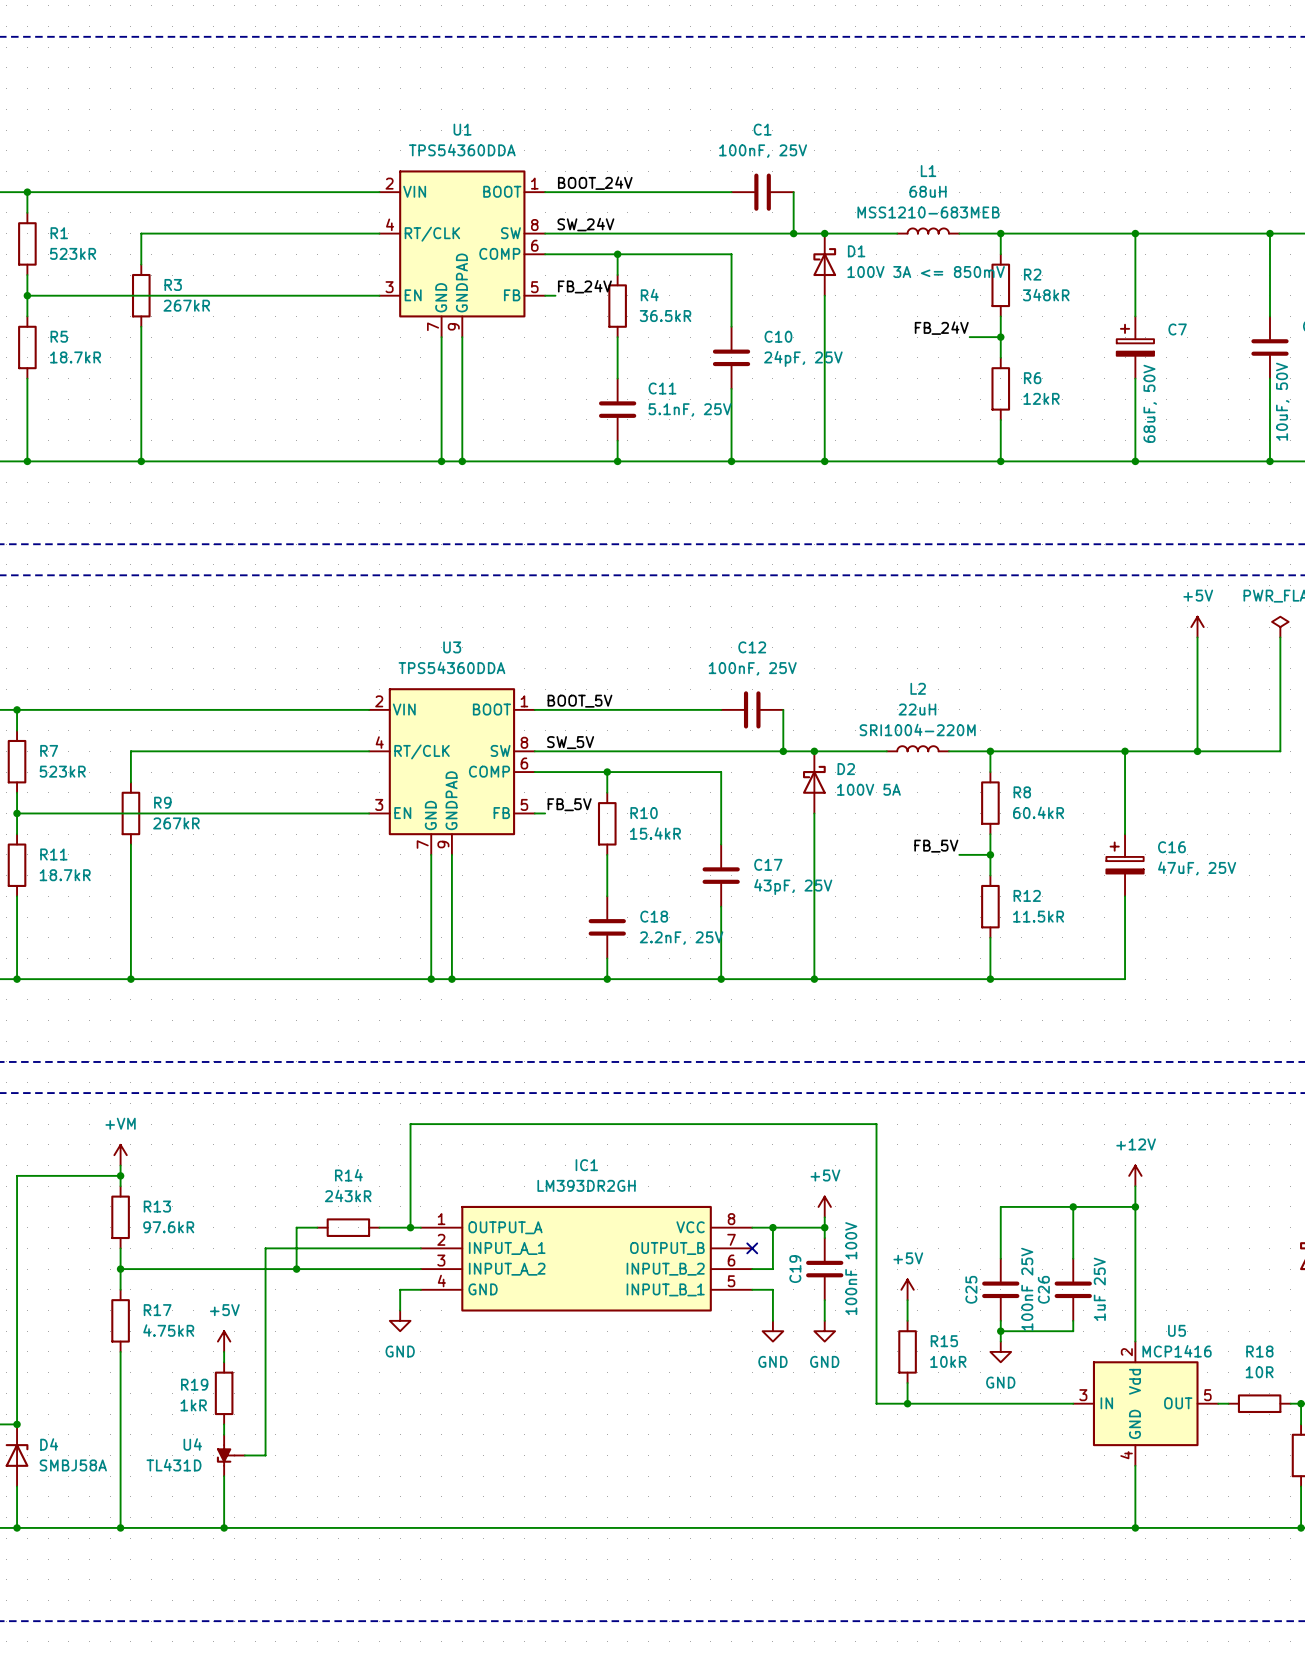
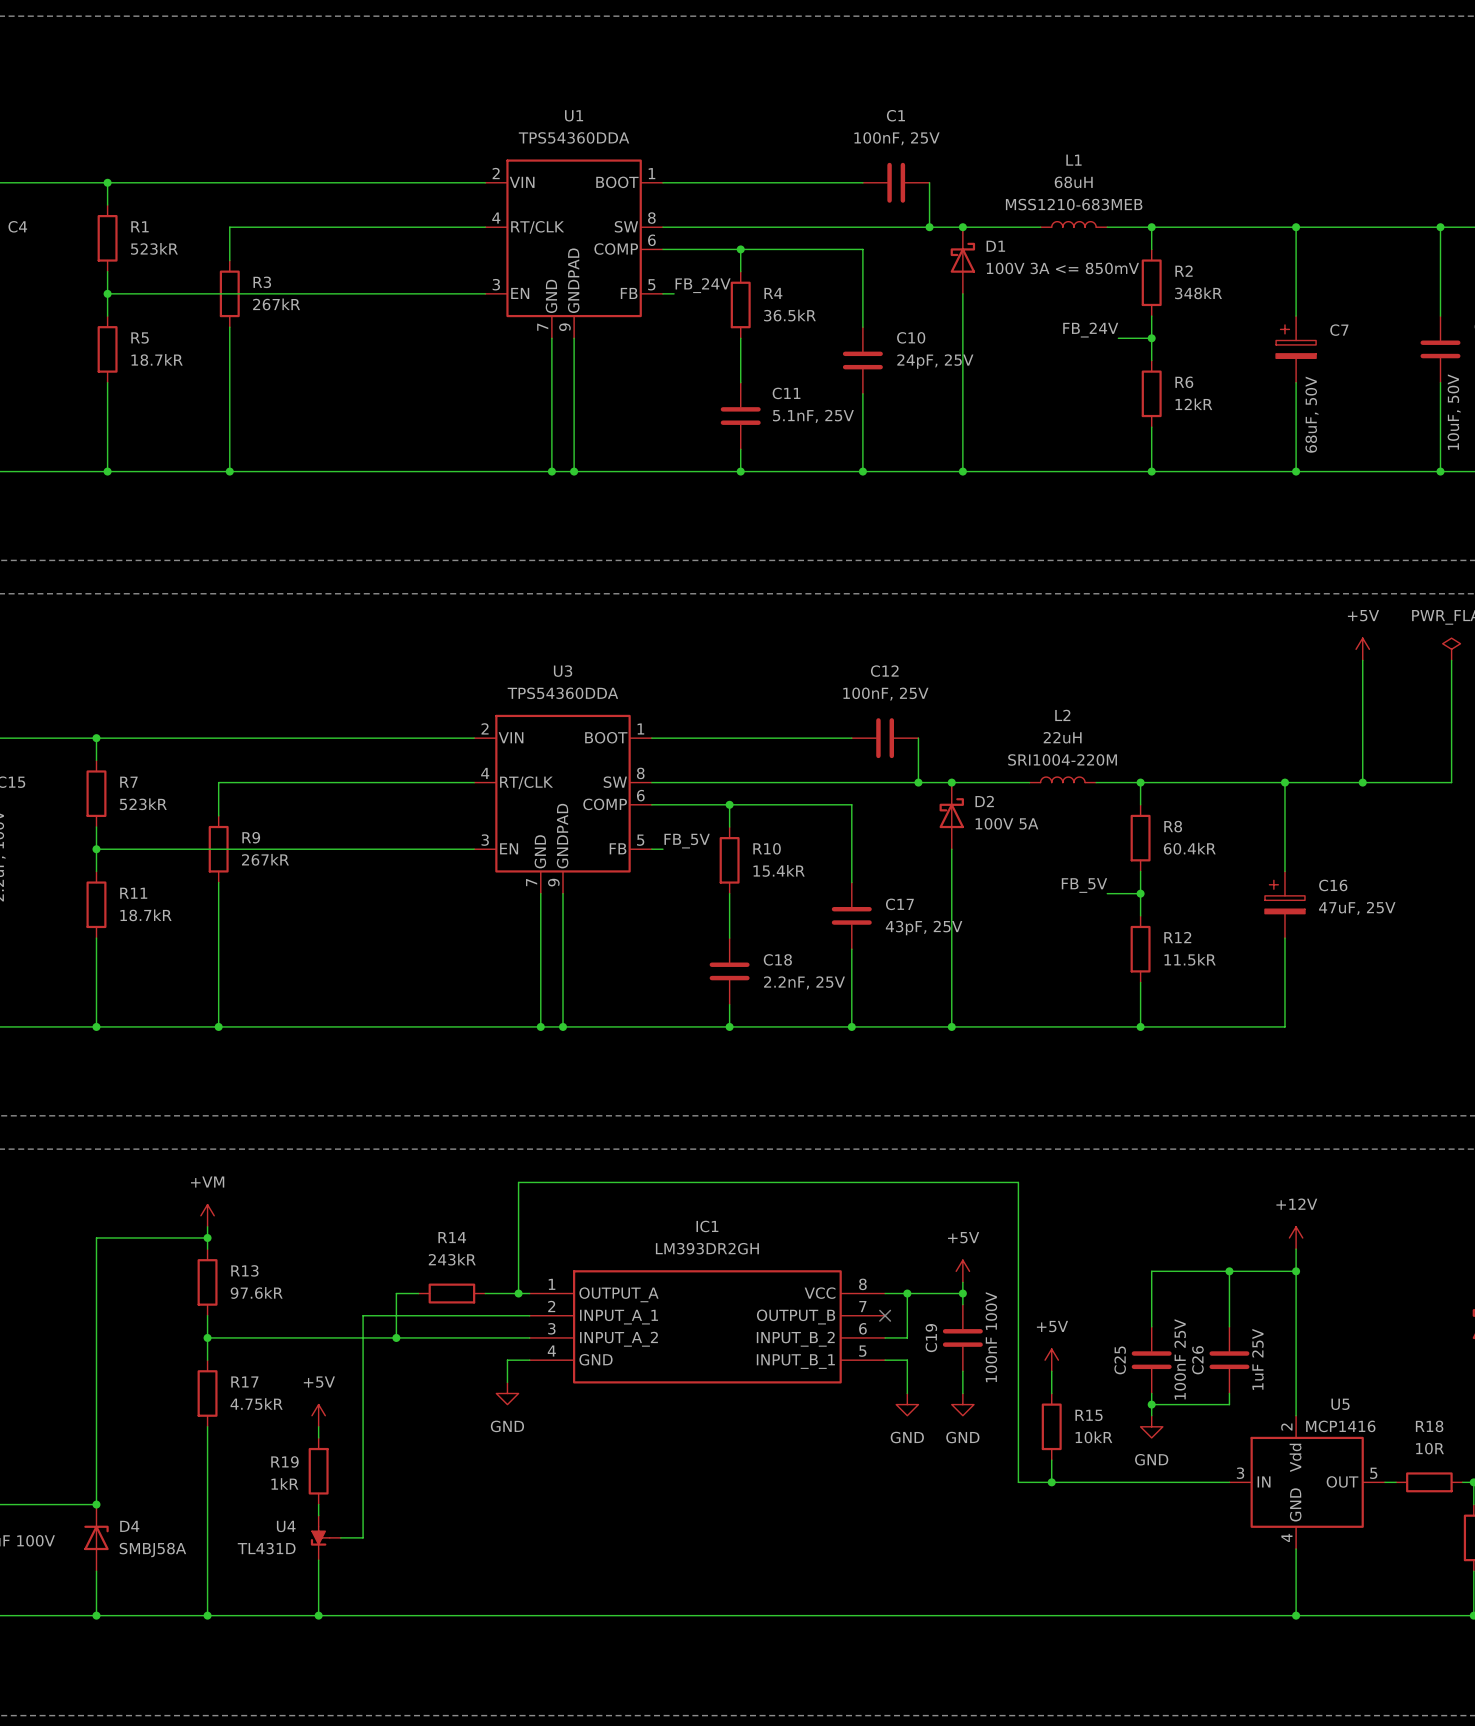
label: BOOT_24V (595, 183) -> none
label: SW_24V (585, 224) -> none
label: BOOT_5V (579, 701) -> none
label: SW_5V (570, 742) -> none

